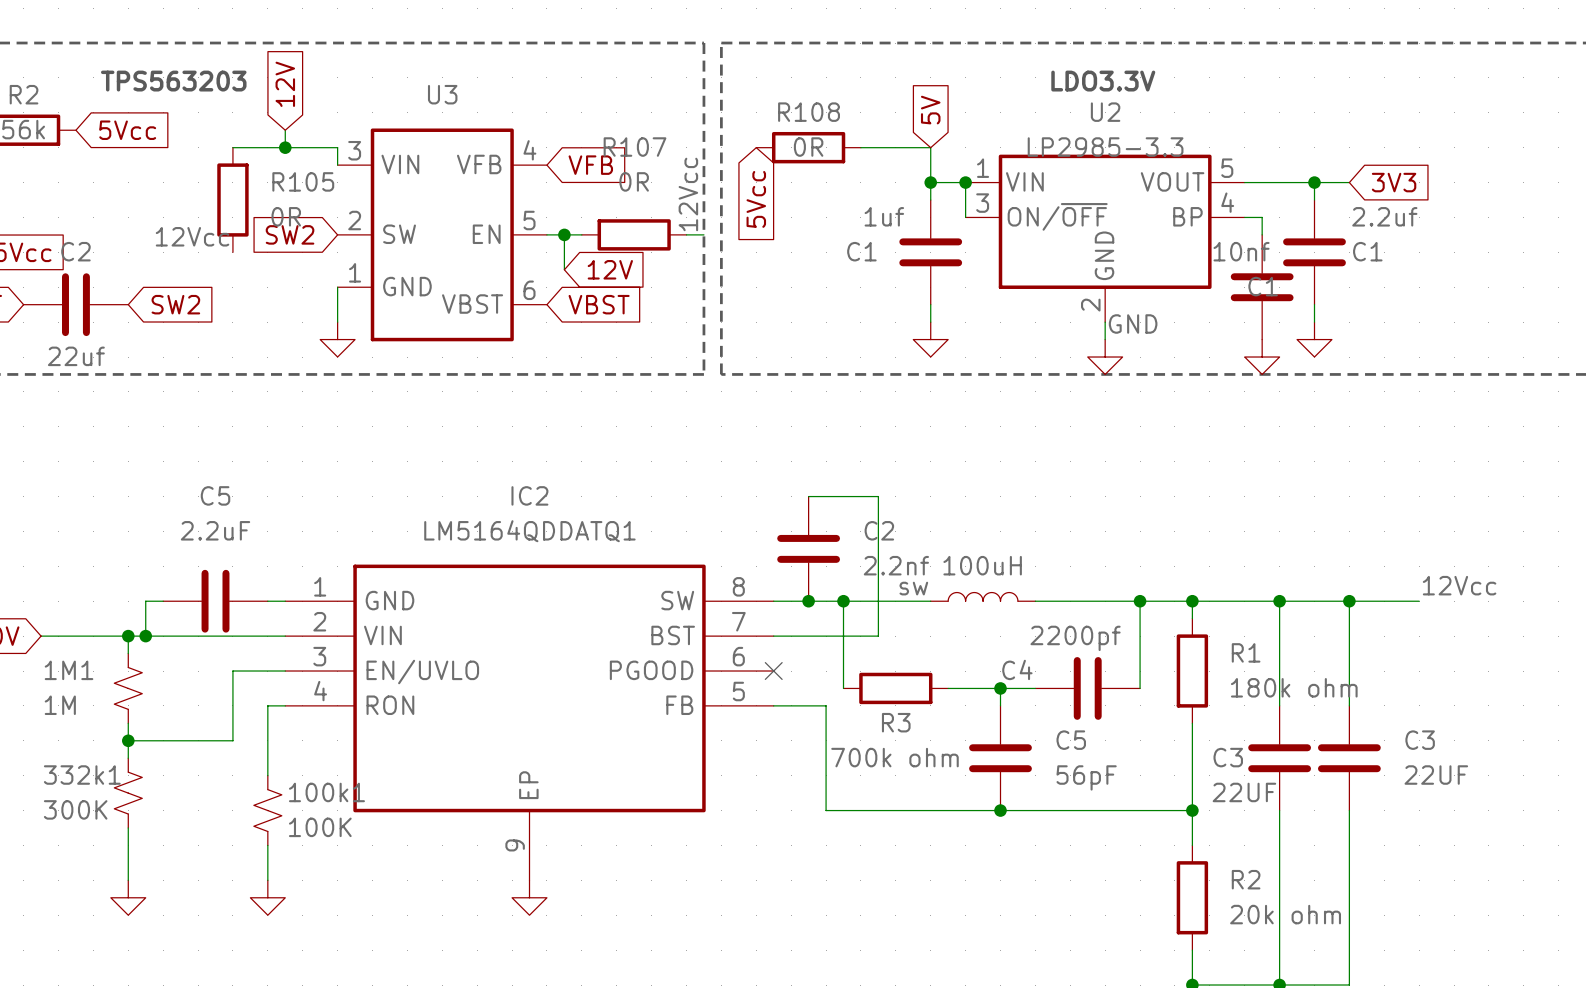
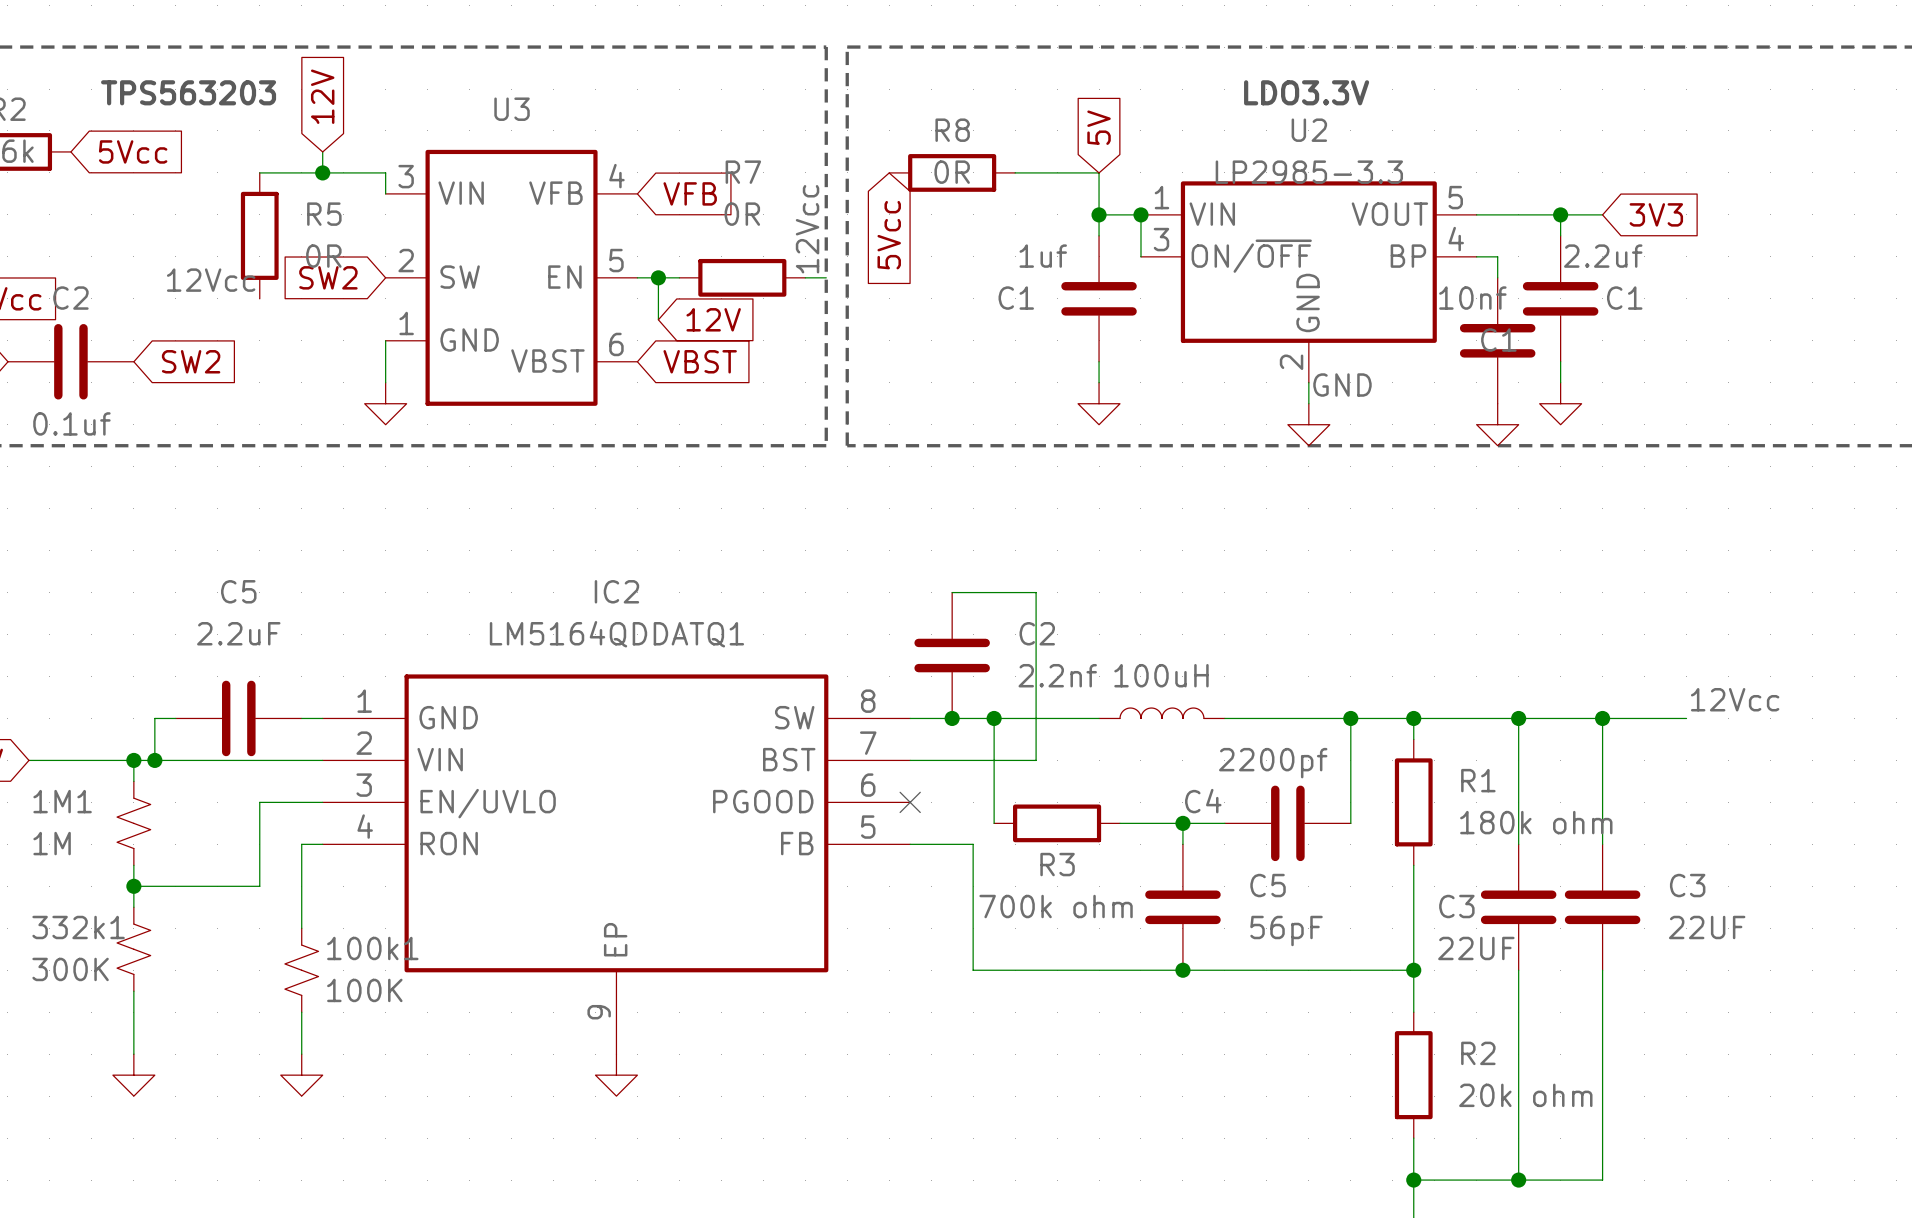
R108 name: R108 (809, 112) -> R8 (952, 130)
R107 name: R107 (635, 147) -> R7 (743, 172)
R105 name: R105 (303, 181) -> R5 (324, 214)
C1 value position: 2.2uf (1384, 216) -> 2.2uf (1603, 256)
C2 value: 22uf (76, 356) -> 0.1uf (71, 423)
label: sw (913, 588) -> none

